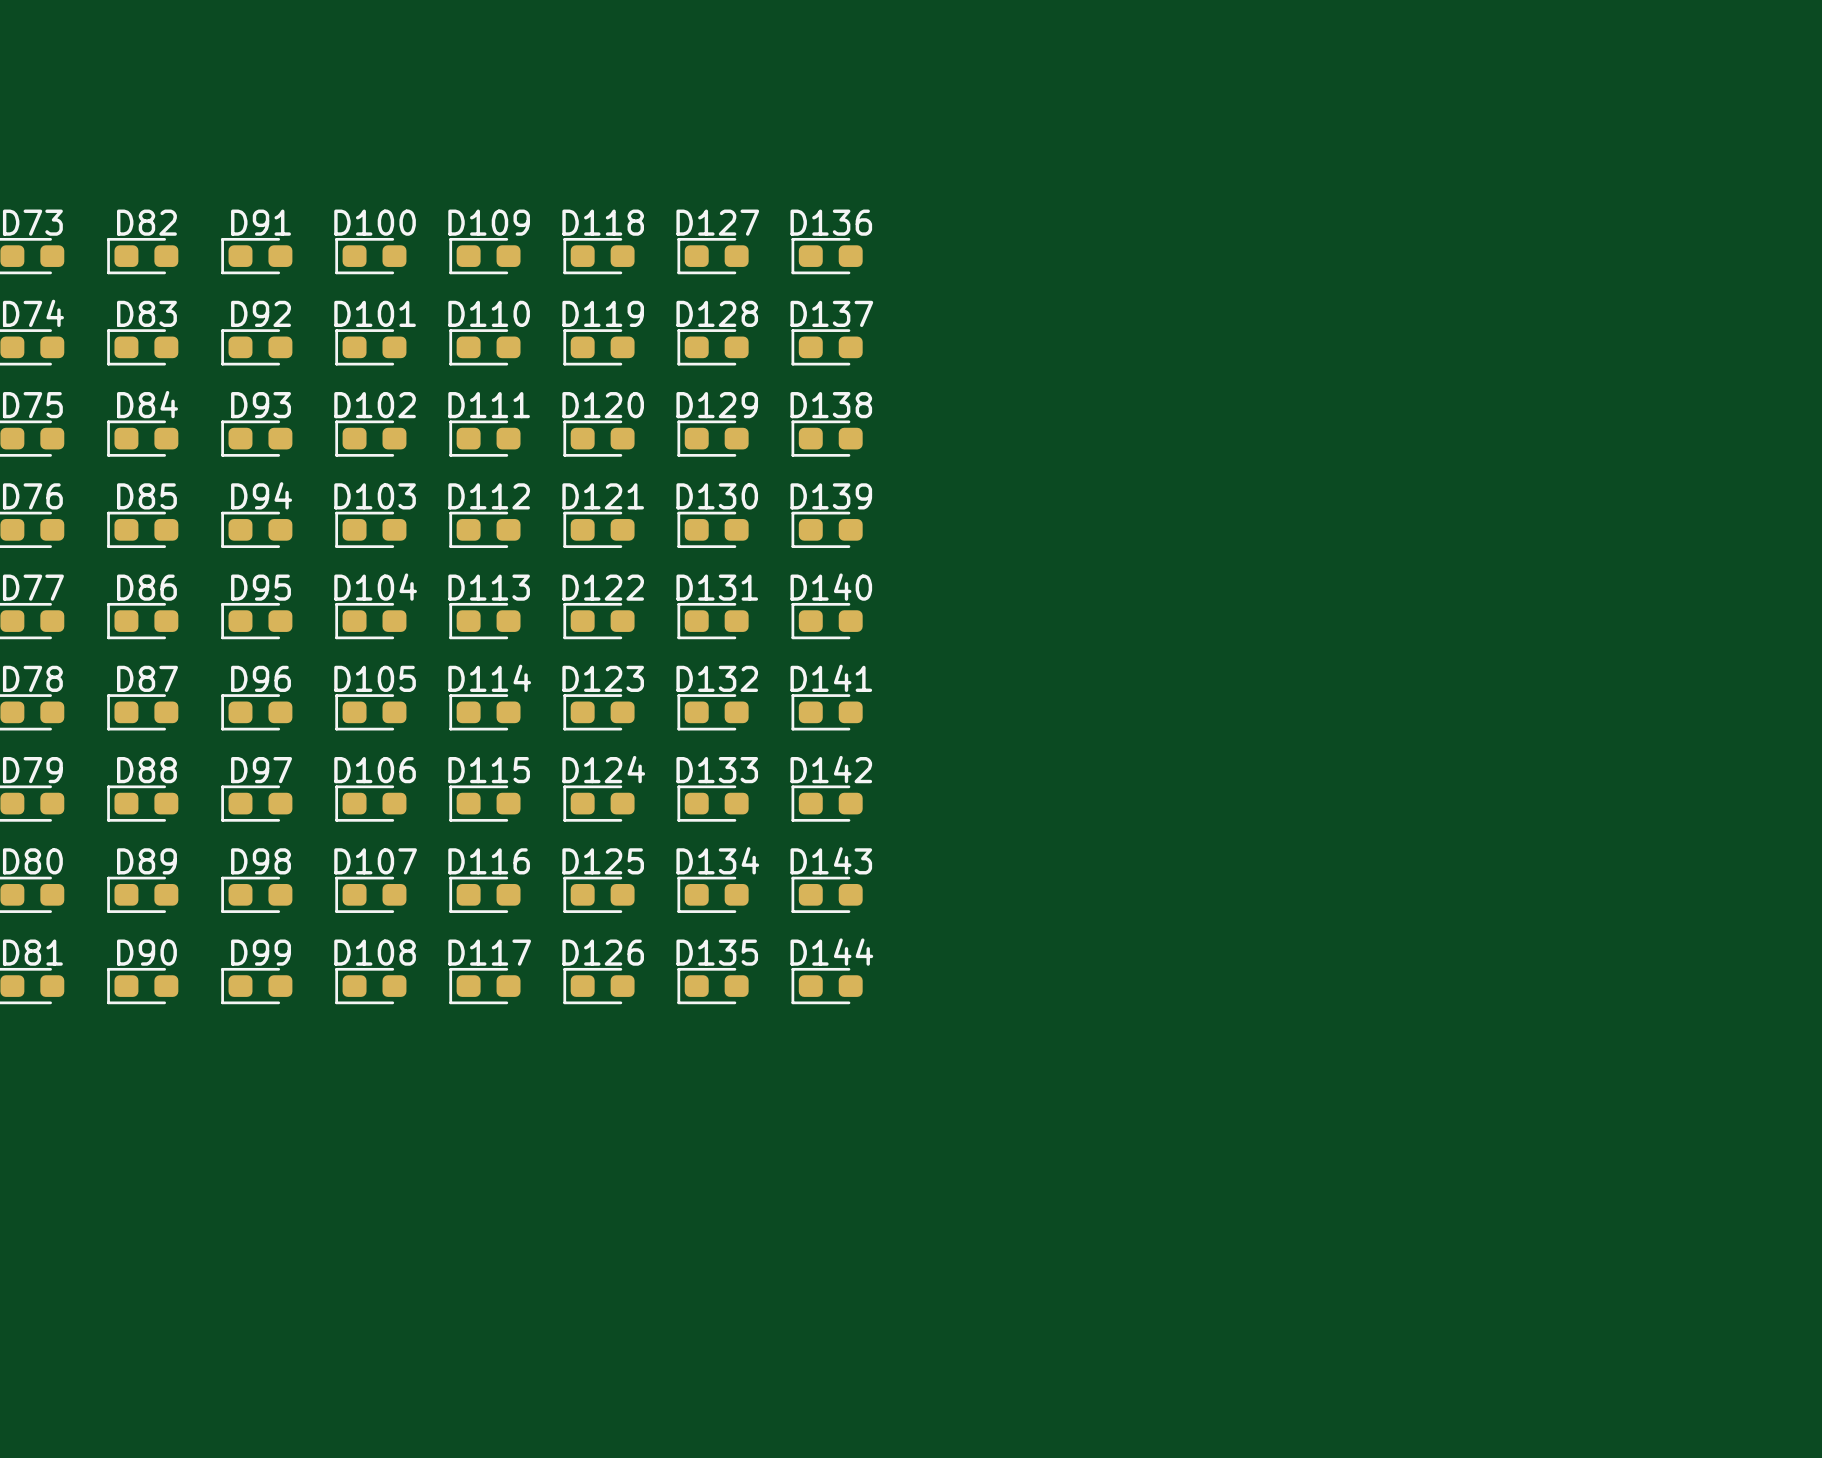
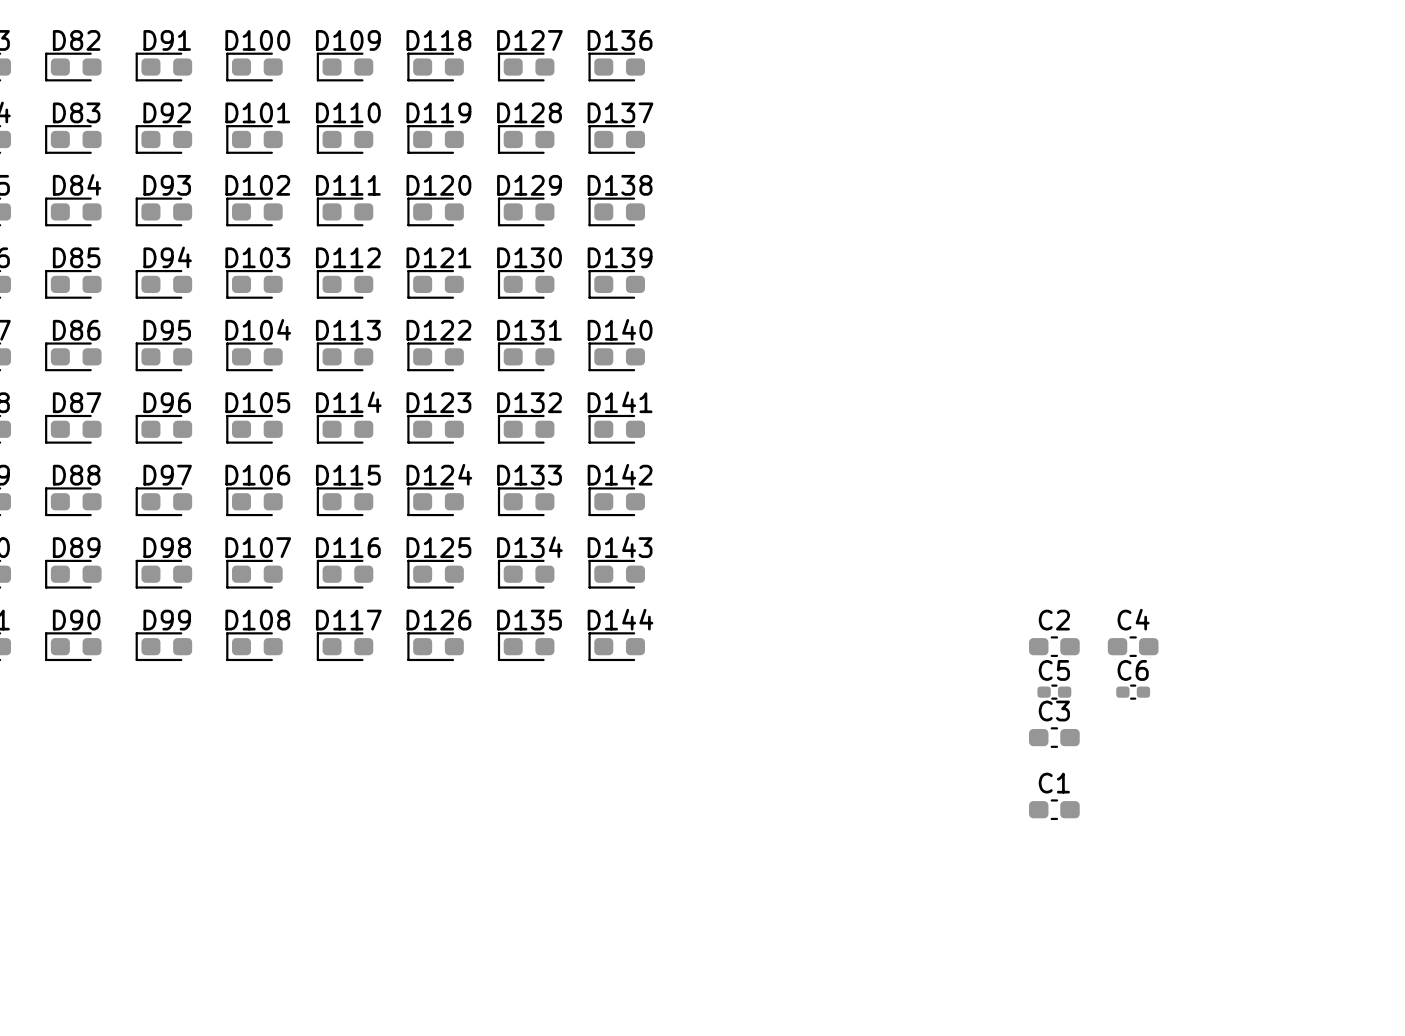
C2: none -> (1054, 646)
C4: none -> (1133, 646)
C5: none -> (1054, 692)
C6: none -> (1133, 692)
C3: none -> (1054, 737)
C1: none -> (1054, 809)

